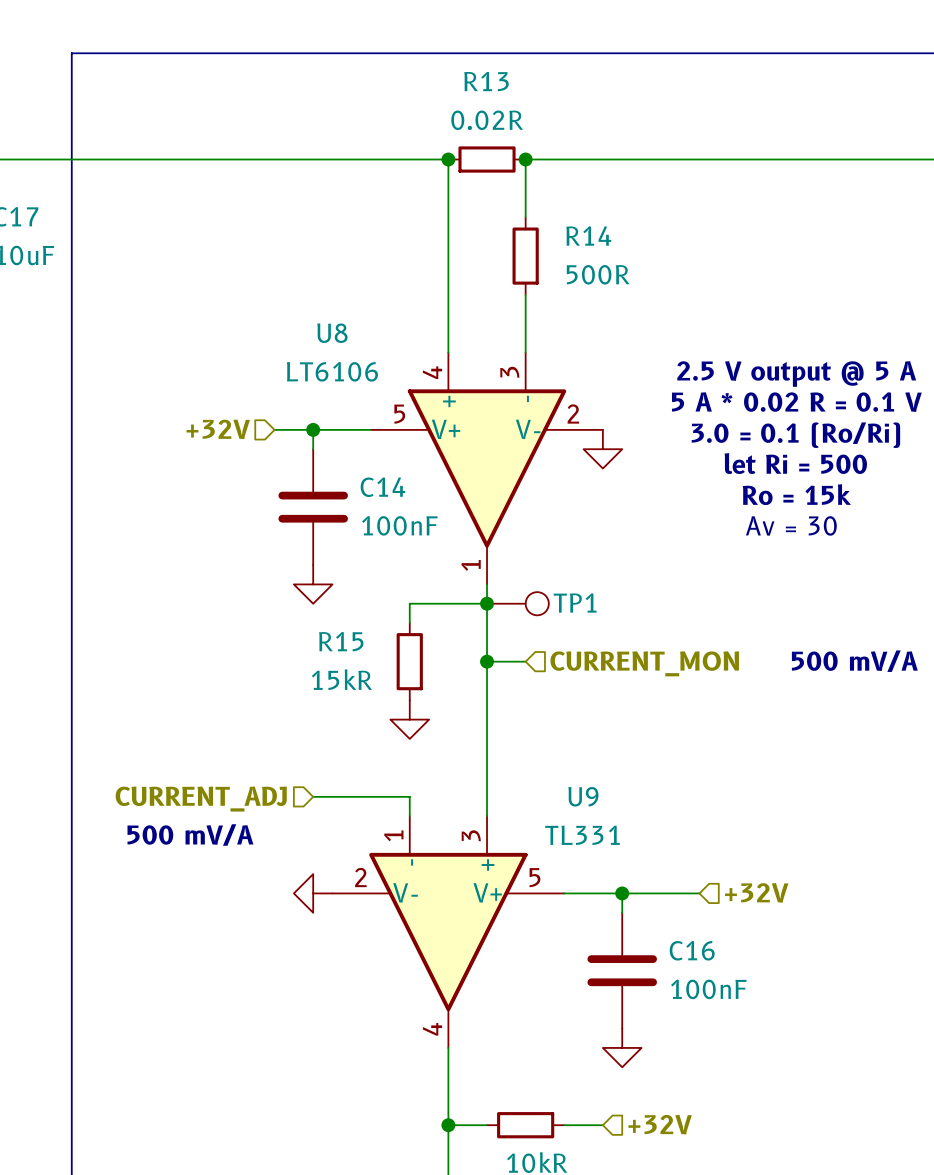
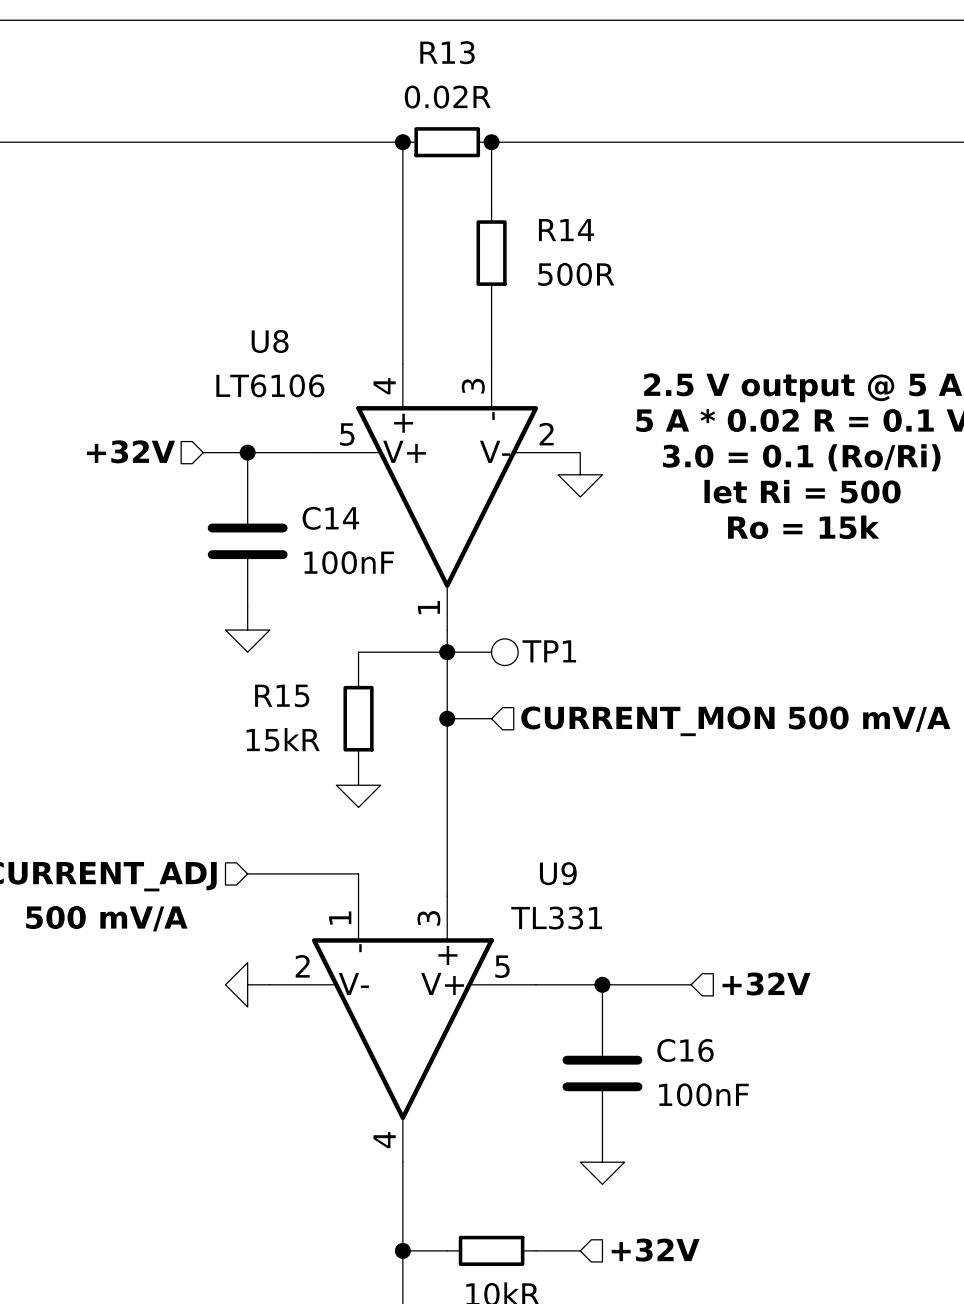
text: Av = 30 (791, 525) -> none

